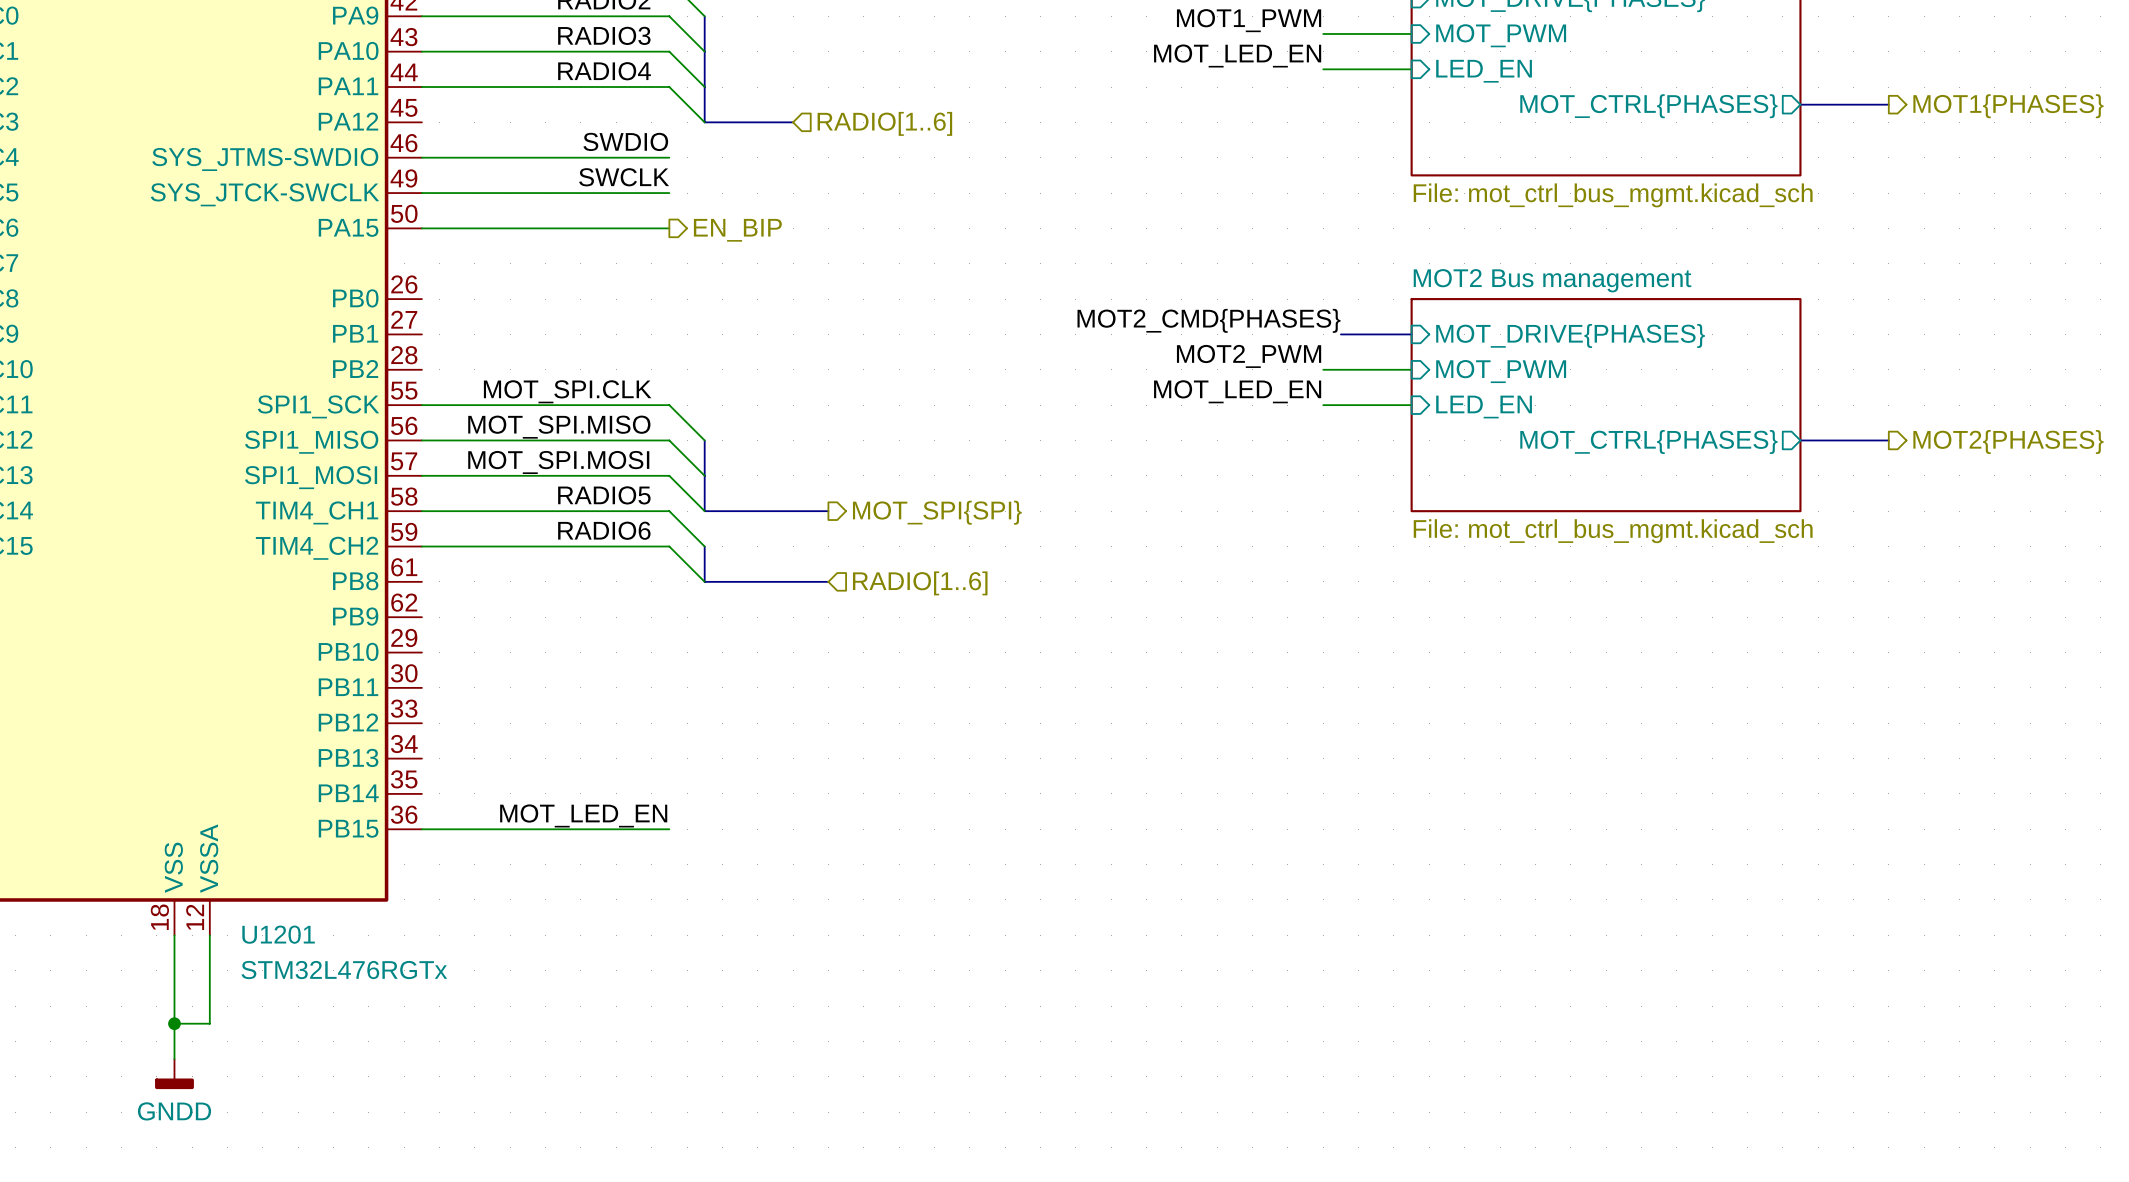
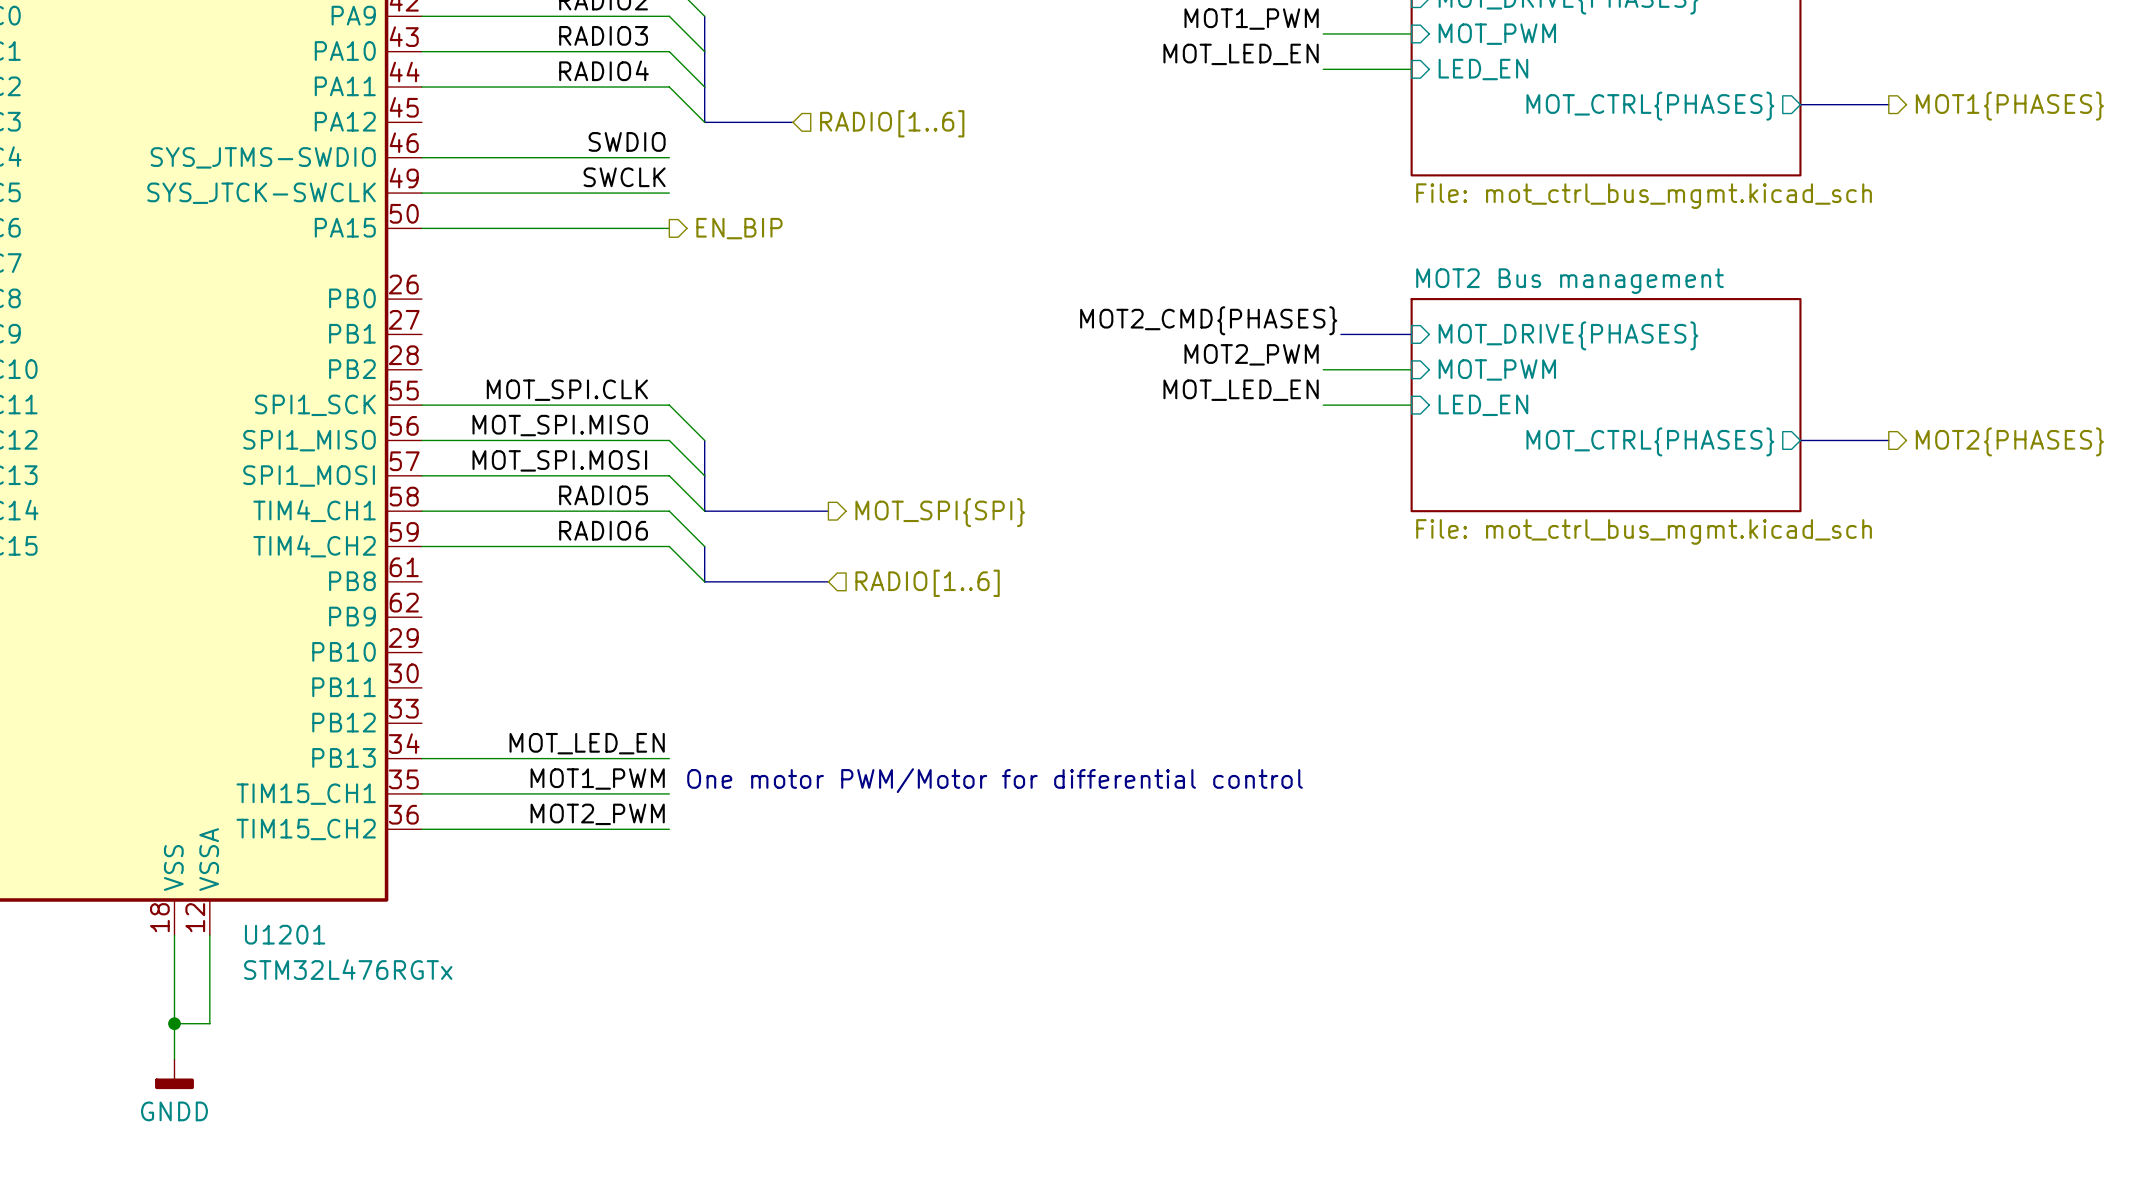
label: none -> MOT_LED_EN (587, 743)
wire: none -> (421, 758) (669, 758)
text: none -> One motor PWM/Motor for differential control (995, 780)
label: none -> MOT1_PWM (597, 779)
U1201 pin name: PB14 (348, 793) -> TIM15_CH1 (306, 794)
wire: none -> (421, 793) (669, 793)
label: MOT_LED_EN (583, 815) -> MOT2_PWM (597, 814)
U1201 pin name: PB15 (348, 828) -> TIM15_CH2 (306, 829)

